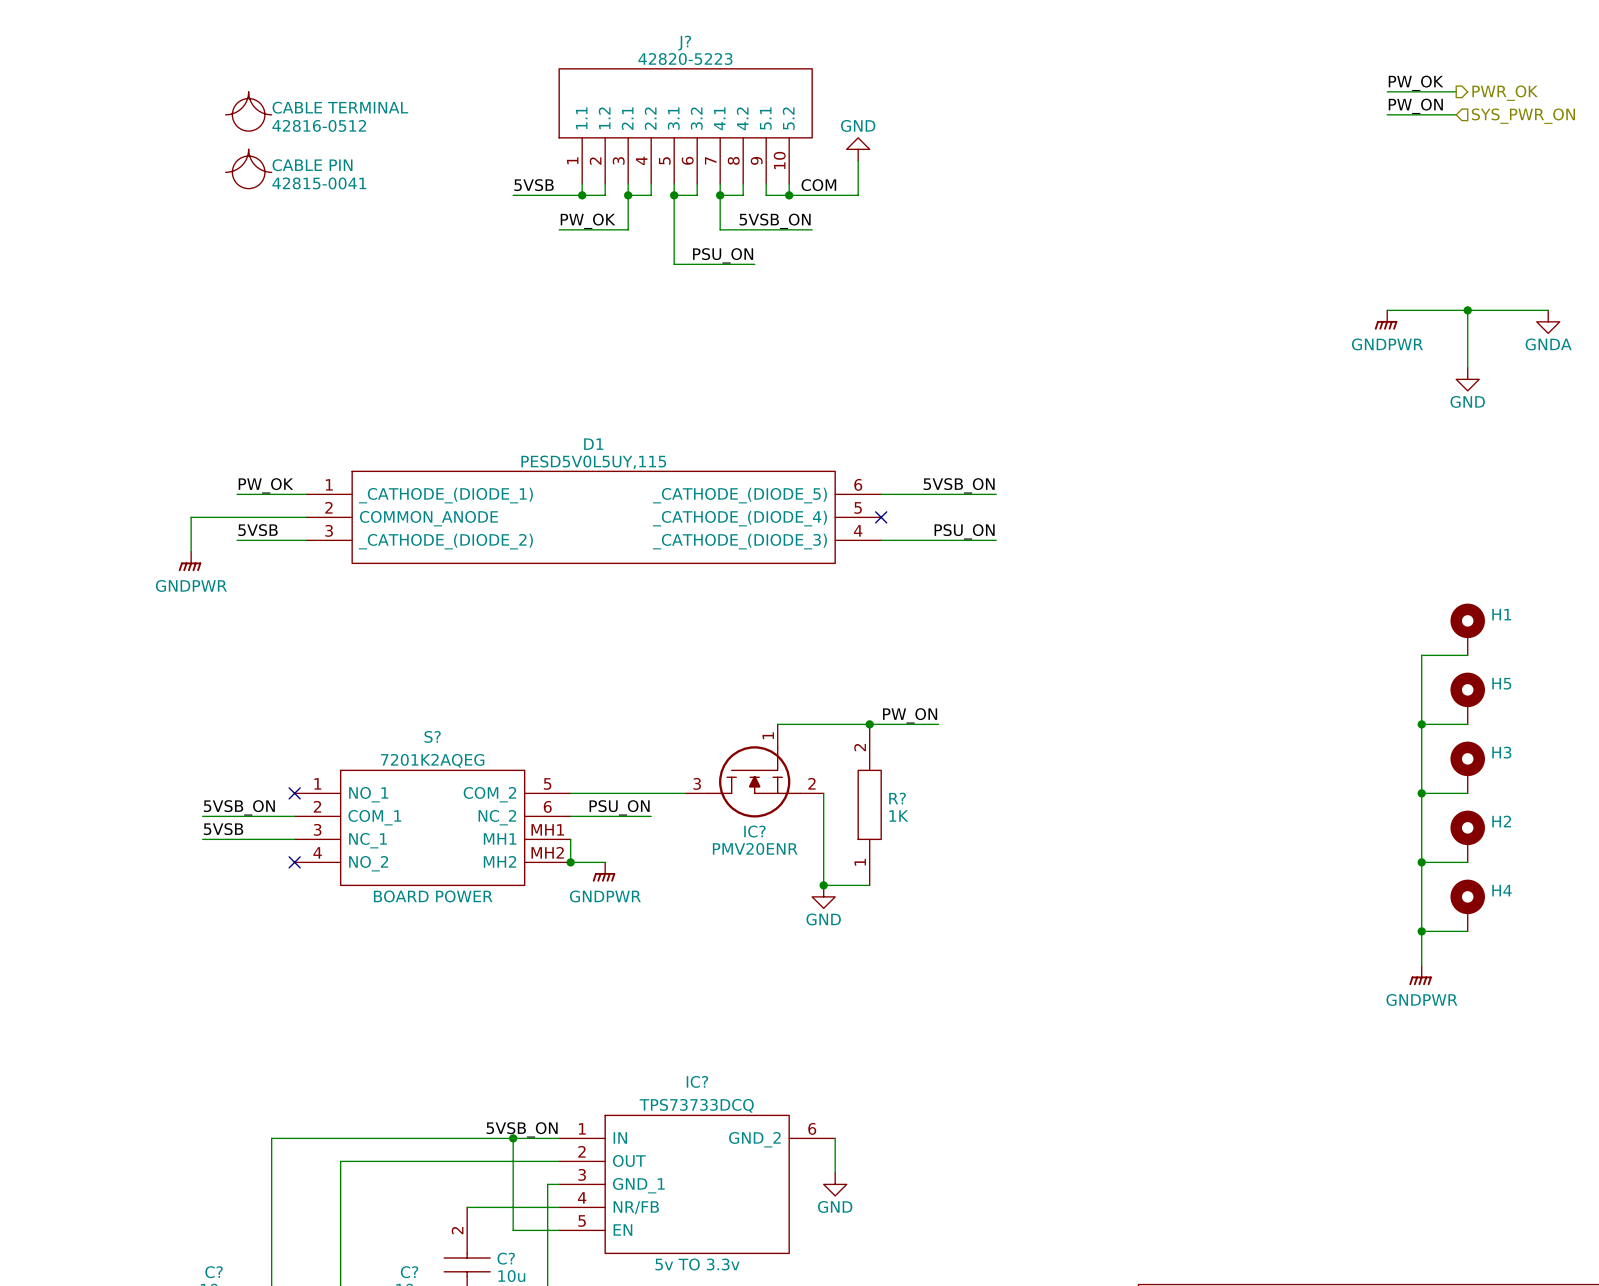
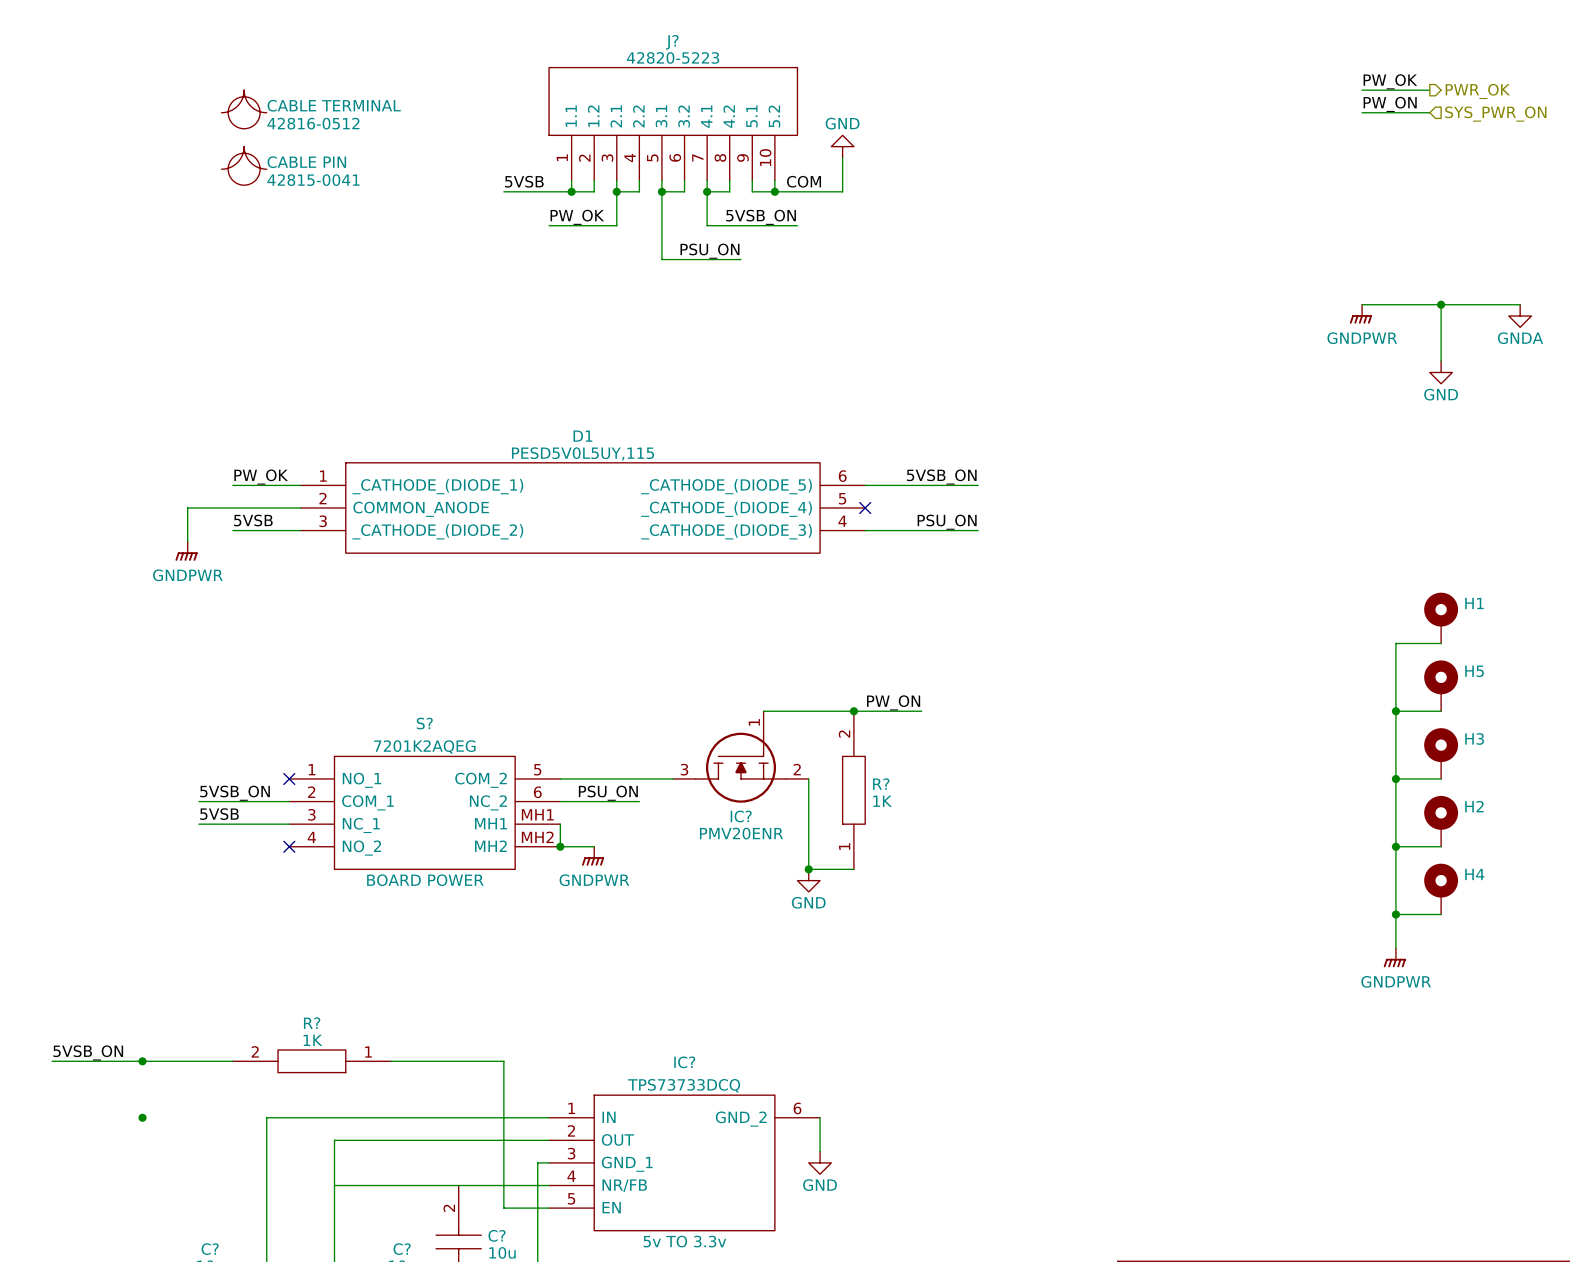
label: none -> 5VSB_ON (88, 1052)
wire: none -> (52, 1061) (232, 1061)
junction: none -> (142, 1061)
R?: none -> 1K (311, 1061)
wire: none -> (390, 1061) (503, 1061) (503, 1117)
label: 5VSB_ON (522, 1129) -> none
junction: none -> (142, 1117)
junction: (513, 1138) -> none
wire: none -> (334, 1185) (458, 1185)

